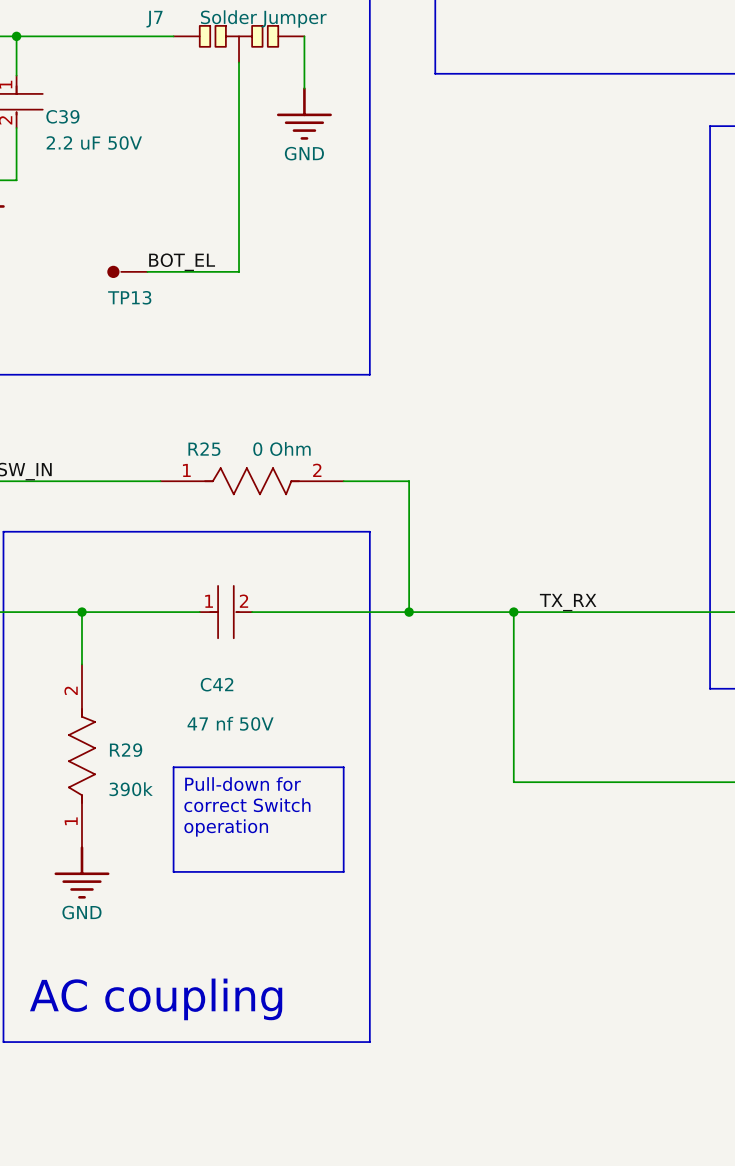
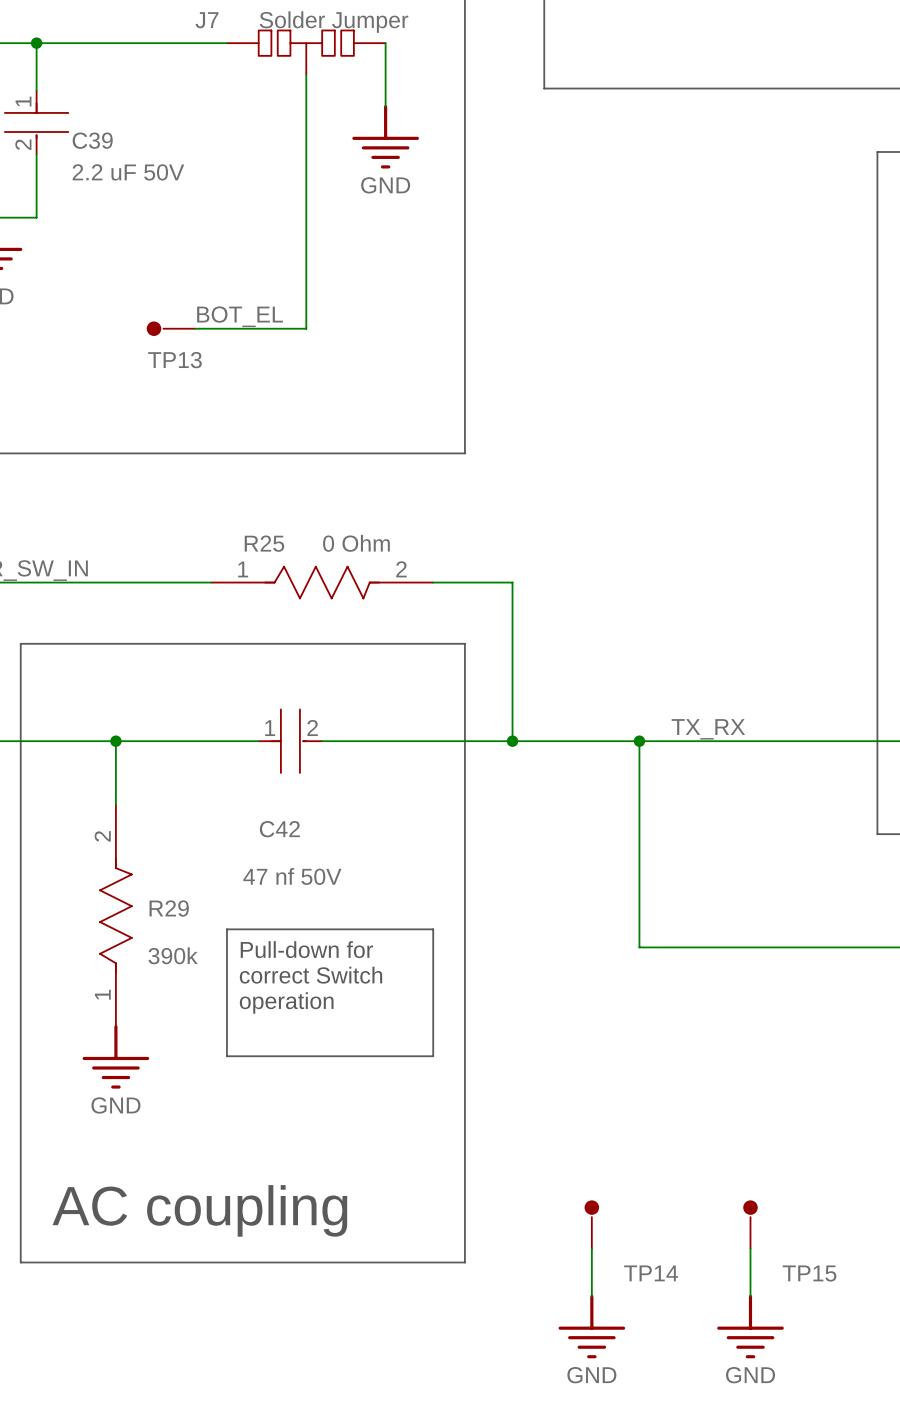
TP14: none -> (591, 1225)
TP15: none -> (750, 1225)
wire: none -> (591, 1248) (591, 1296)
wire: none -> (750, 1248) (750, 1296)
power symbol: none -> GND (591, 1326)
power symbol: none -> GND (750, 1326)

